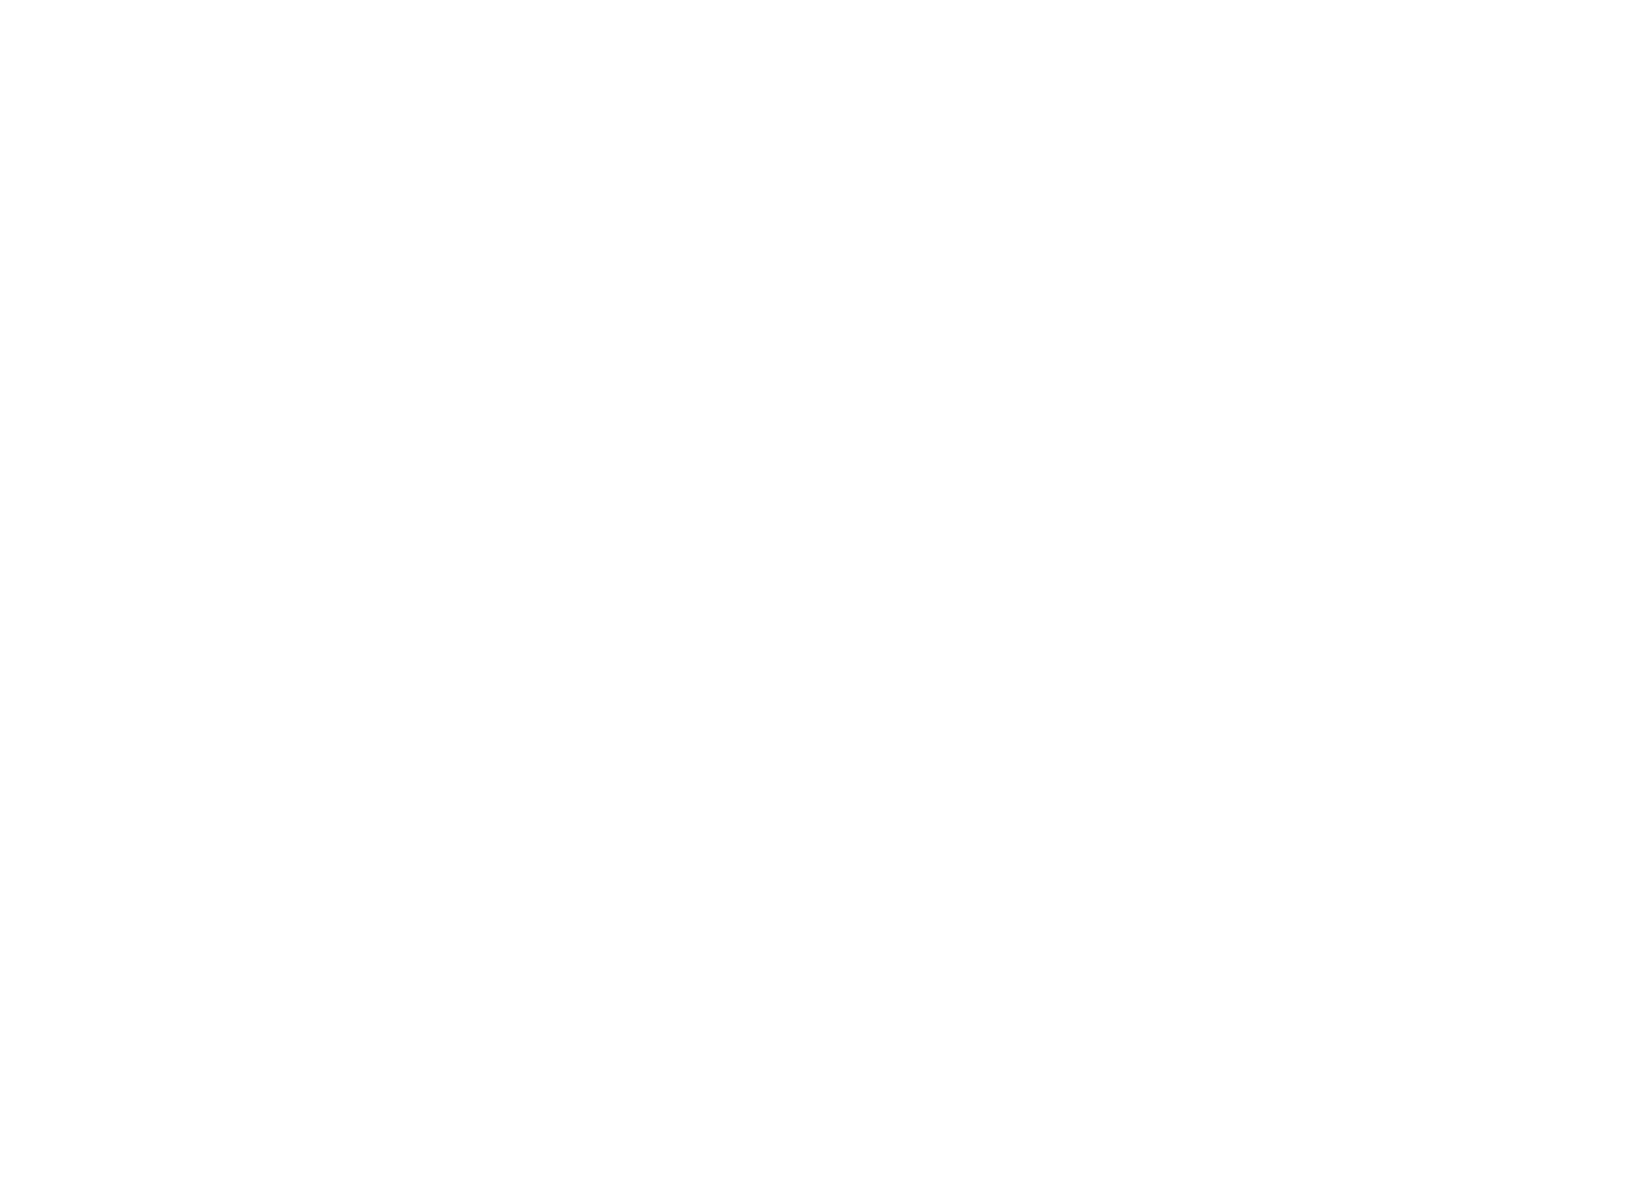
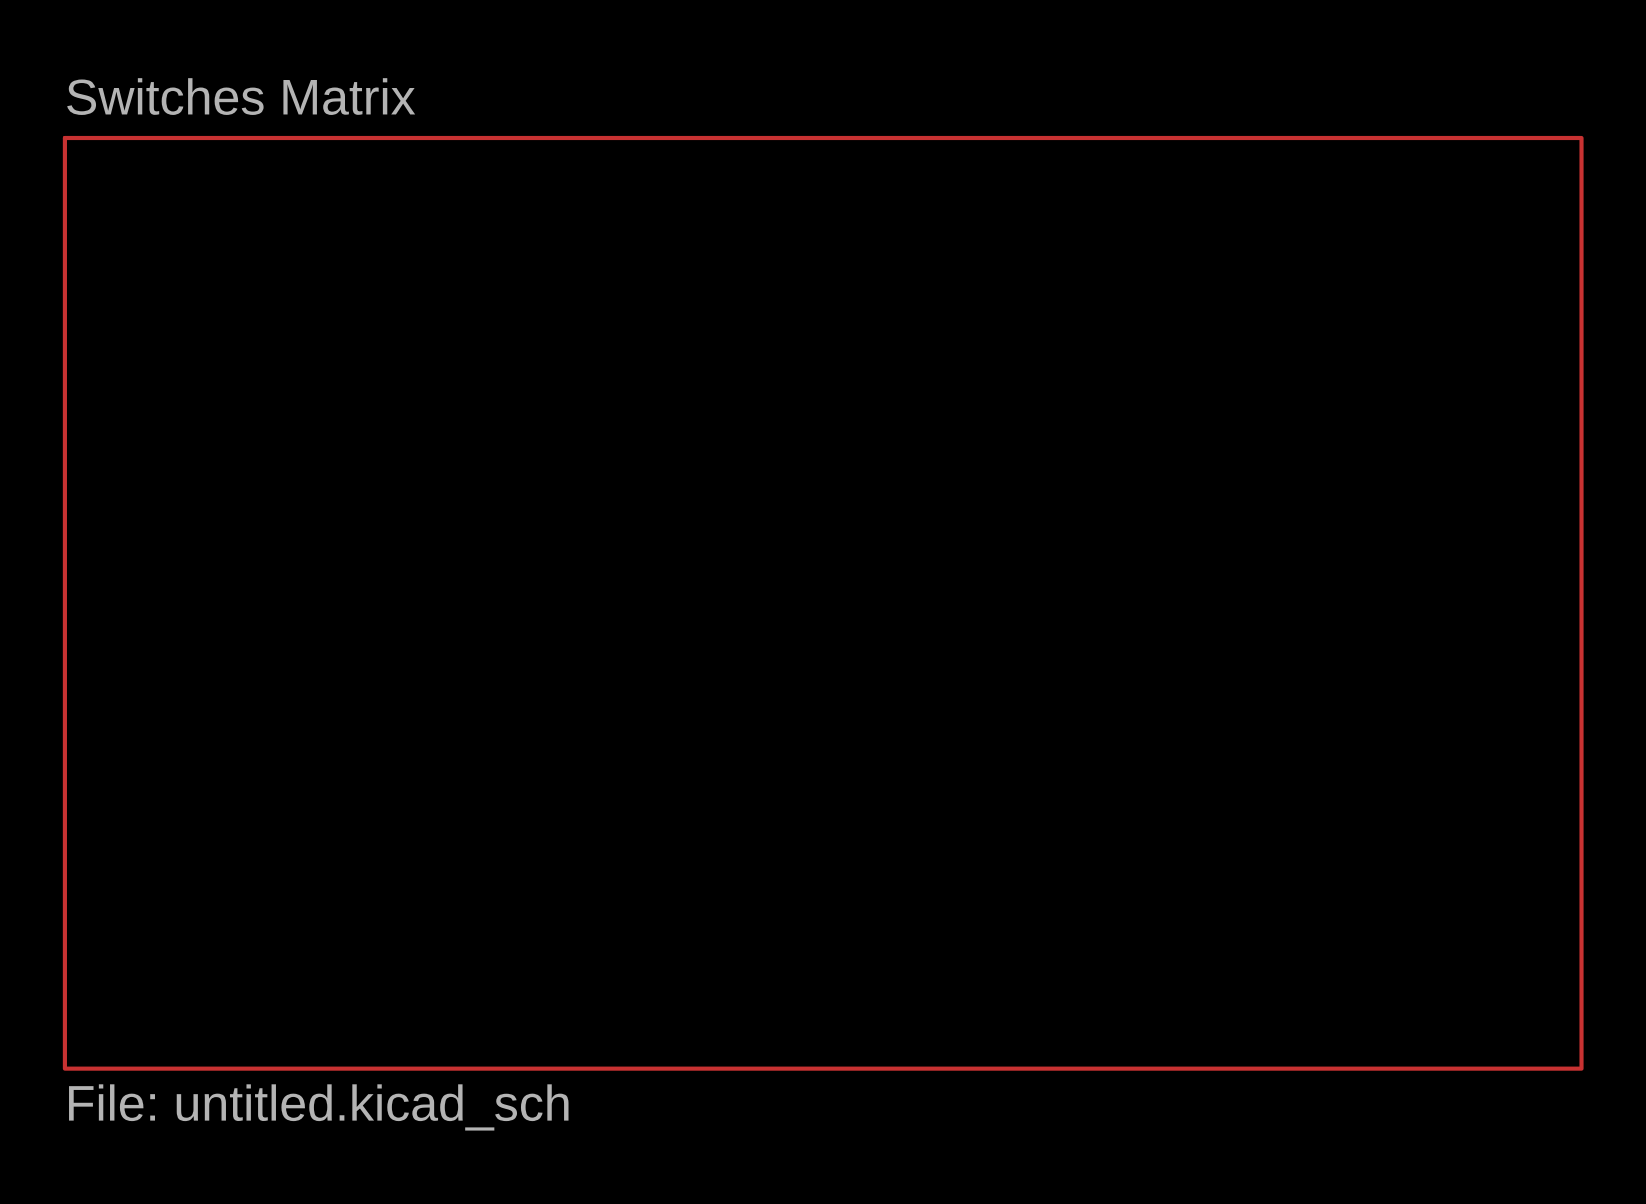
sheet Switches Matrix: none -> File: untitled.kicad_sch (823, 603)

